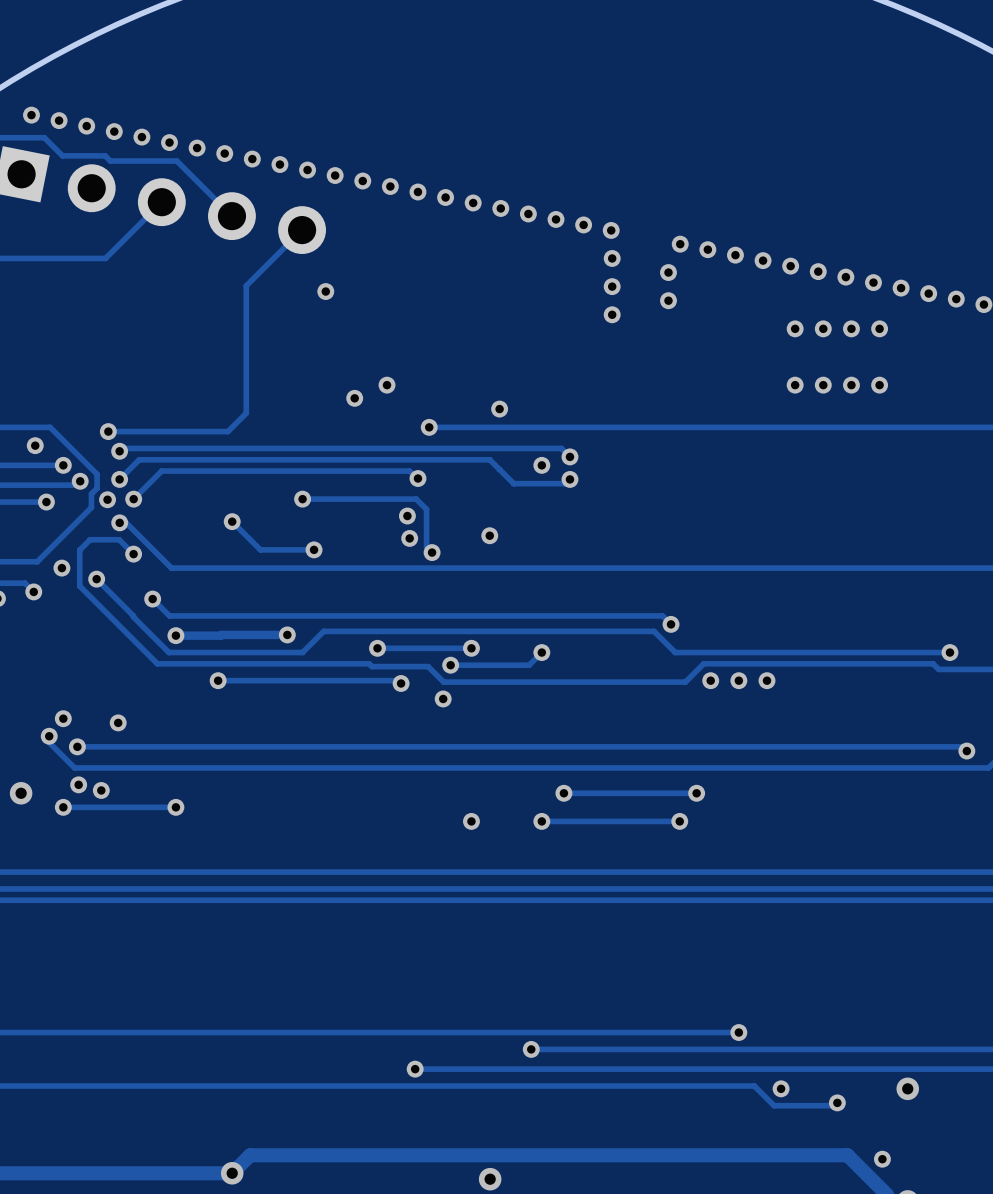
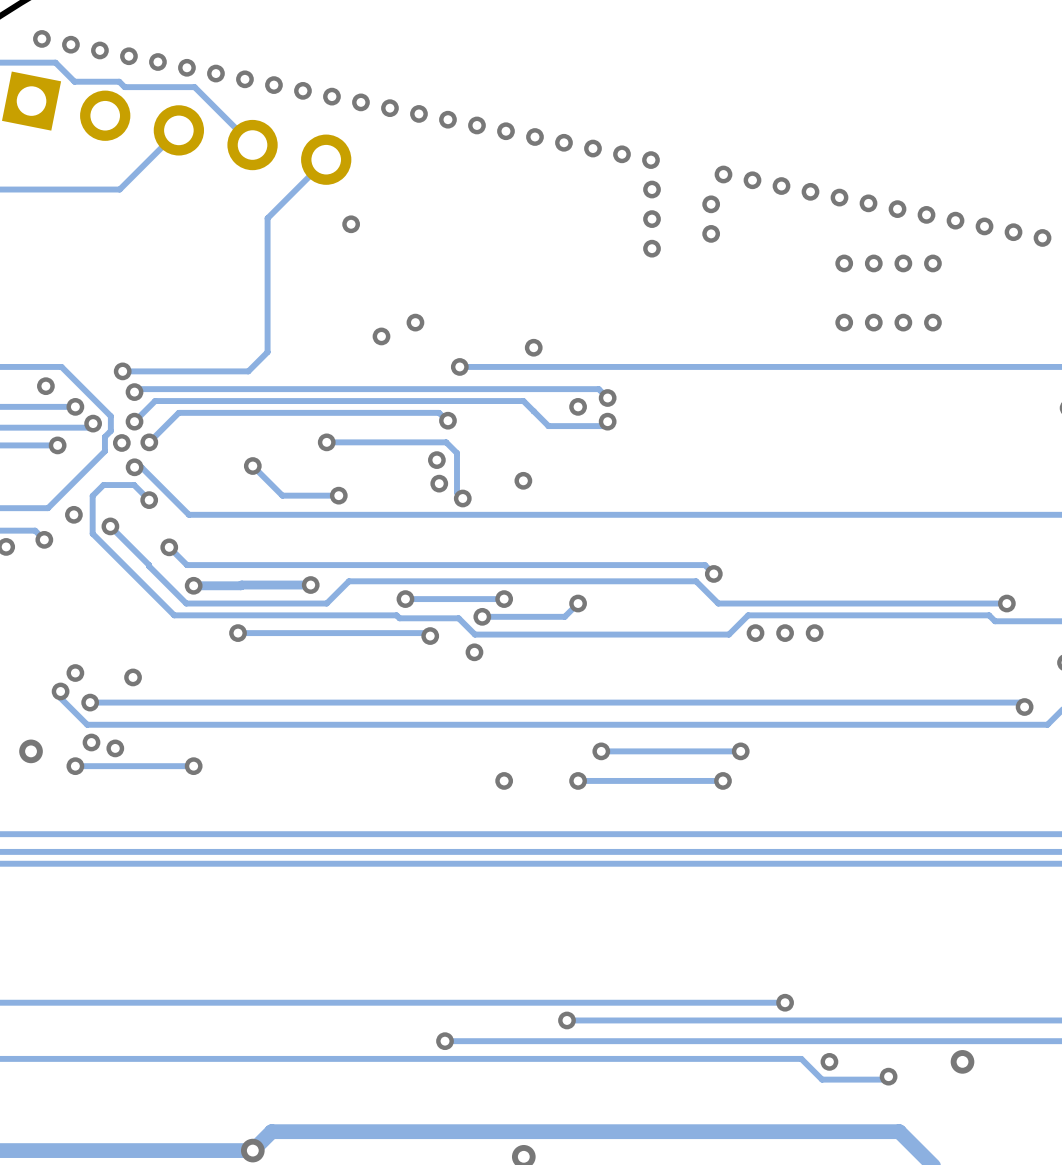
via: (882, 1159) -> none

